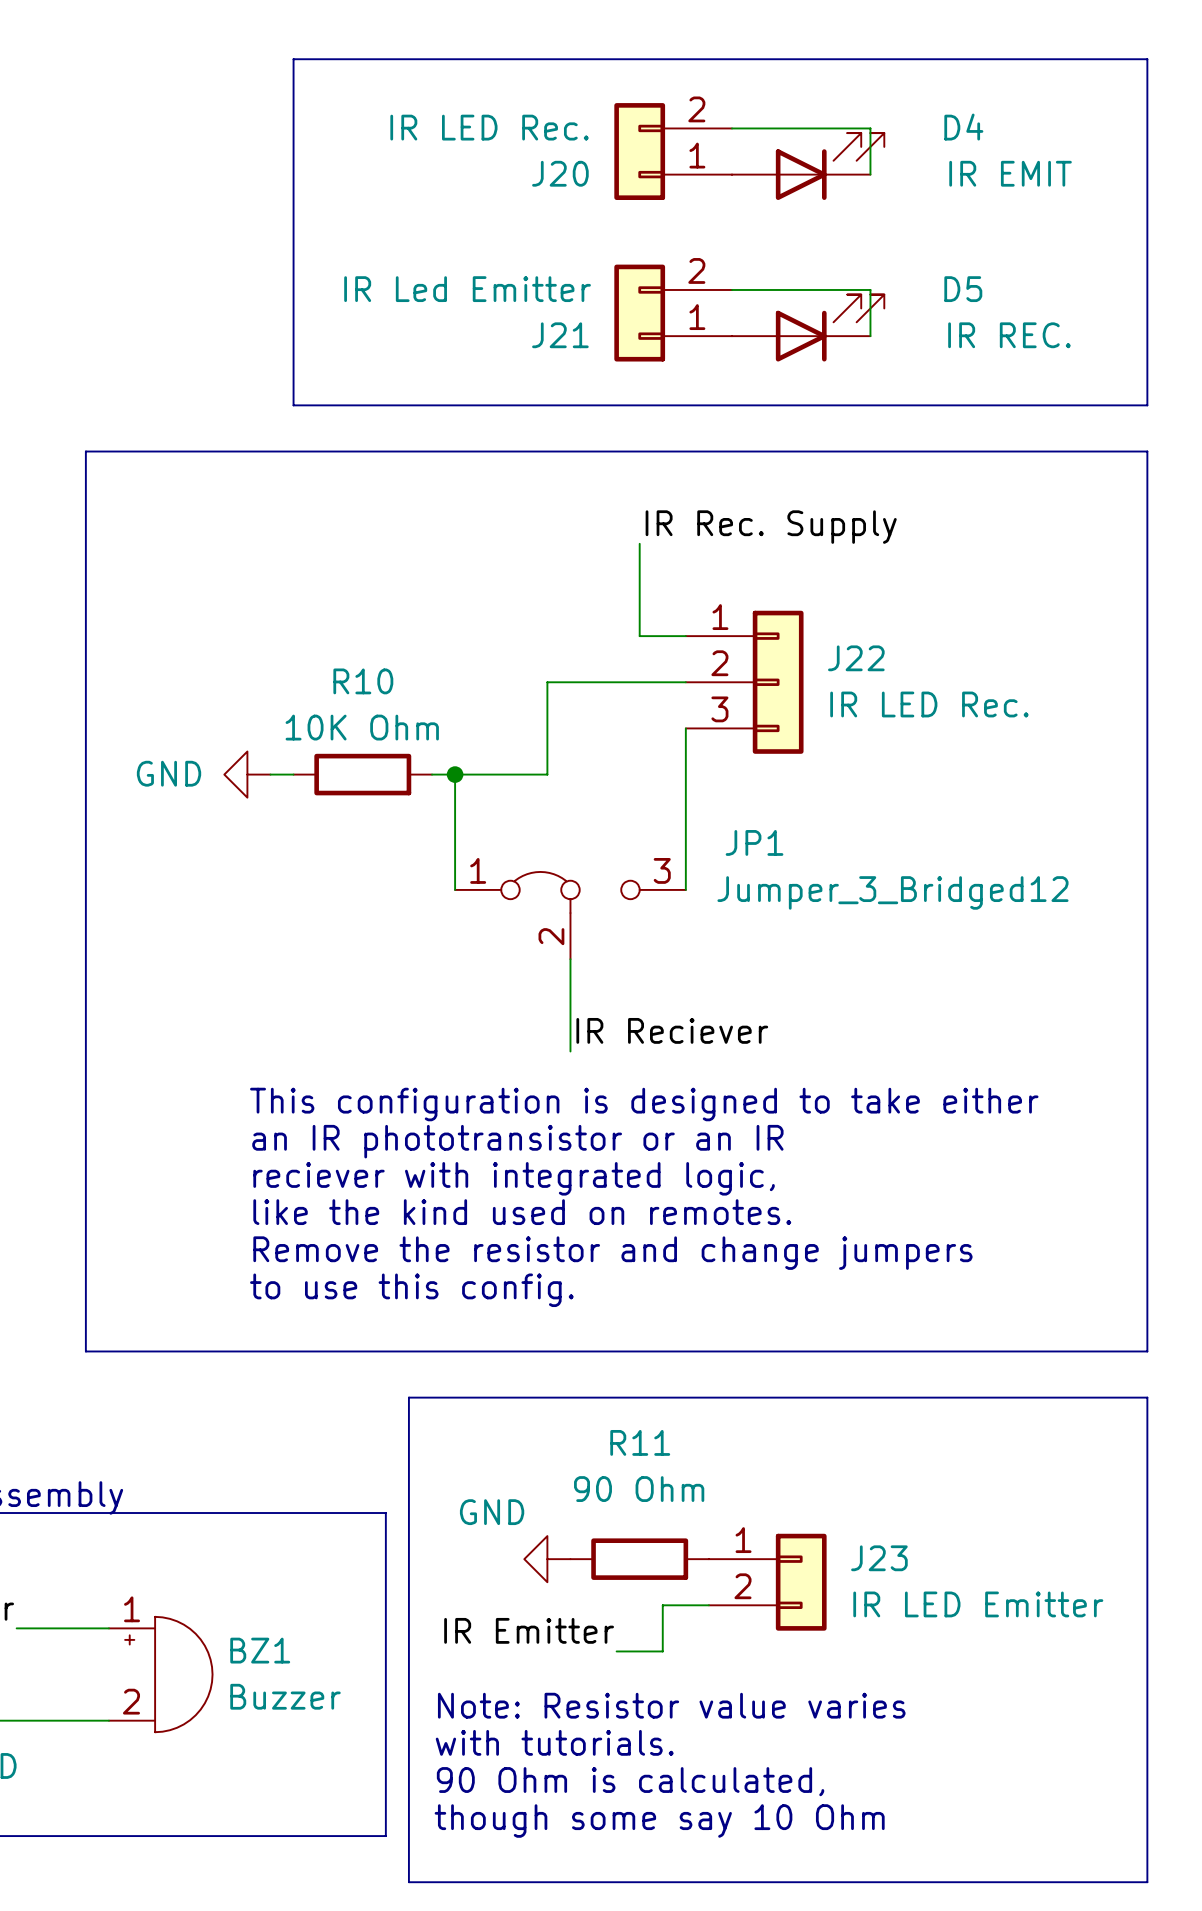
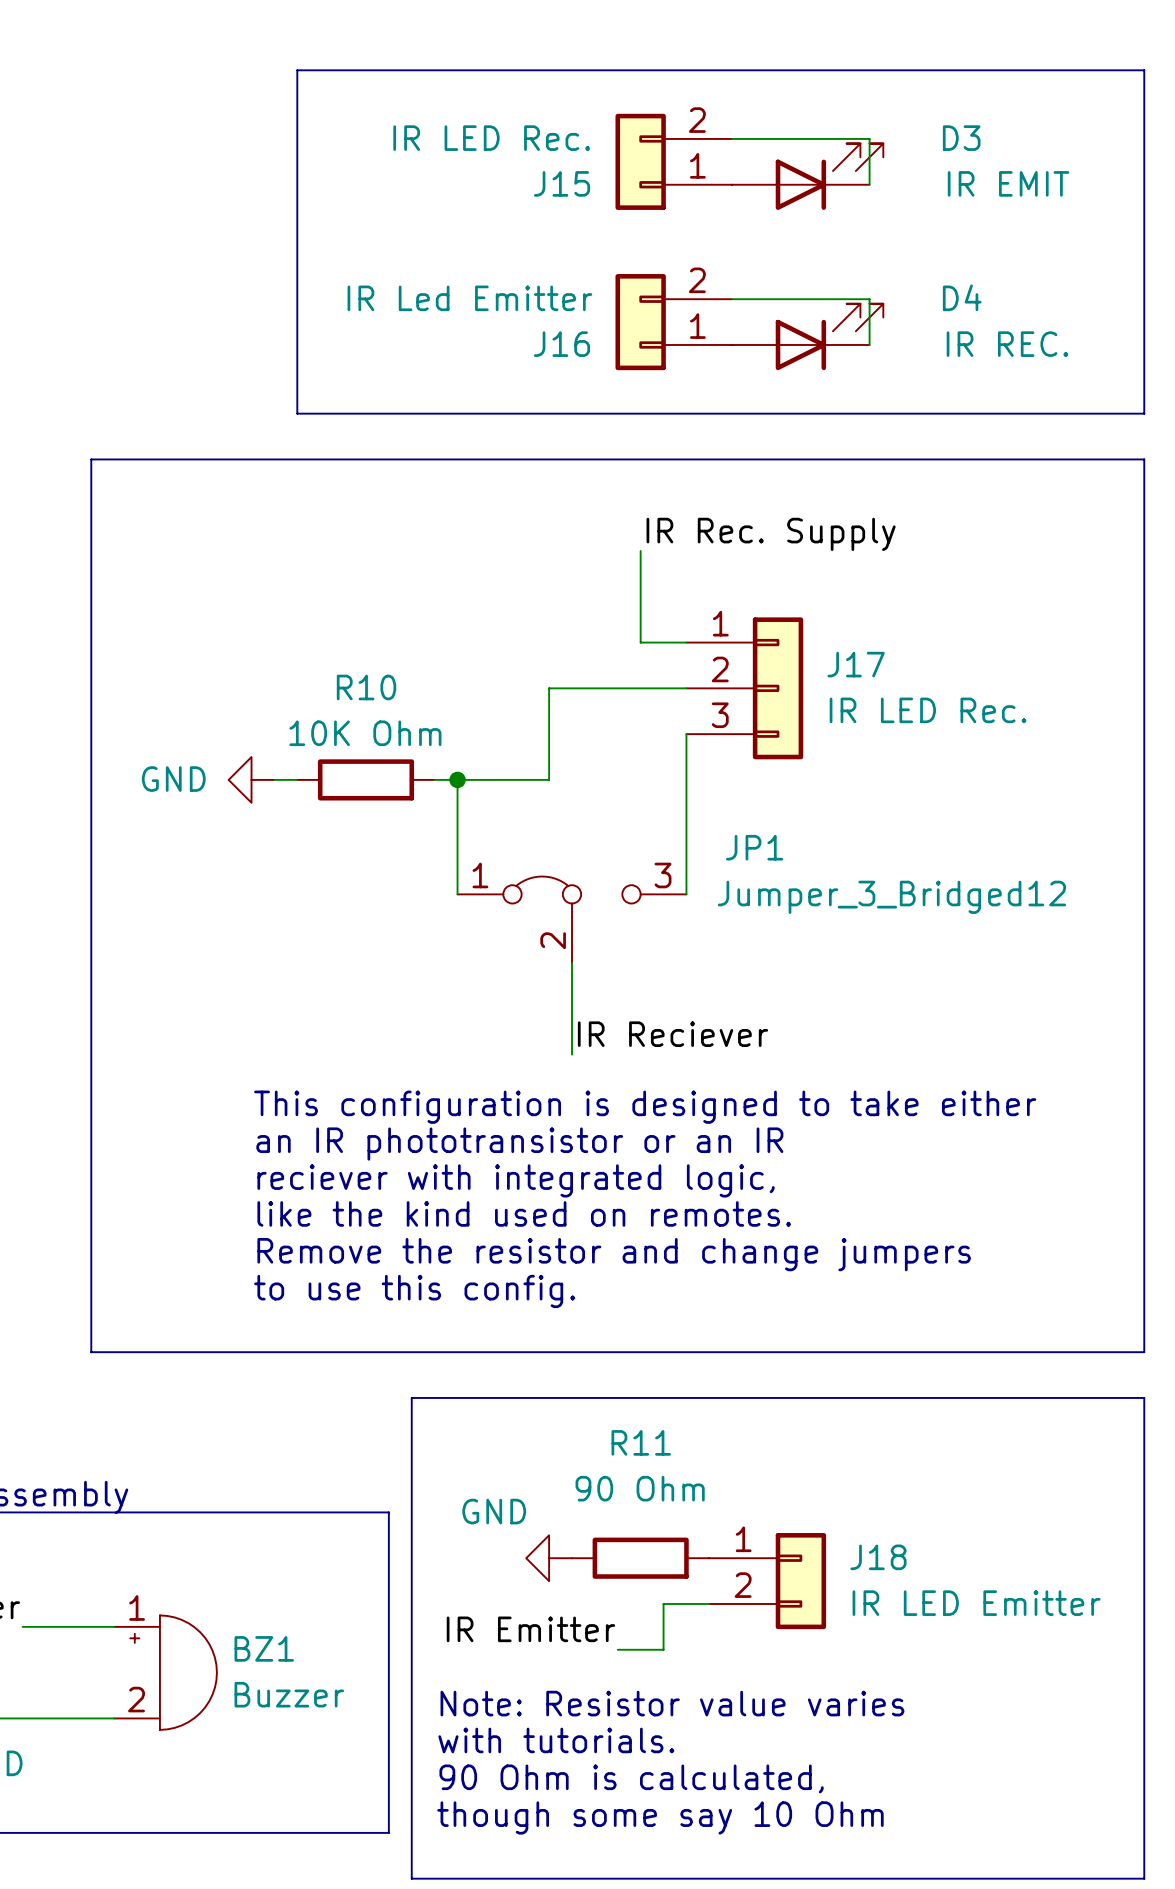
D4 name: D4 (963, 127) -> D3 (961, 138)
J20 name: J20 (560, 173) -> J15 (562, 183)
D5 name: D5 (963, 289) -> D4 (962, 297)
J21 name: J21 (560, 335) -> J16 (562, 344)
J22 name: J22 (856, 658) -> J17 (856, 664)
J23 name: J23 (879, 1558) -> J18 (878, 1557)

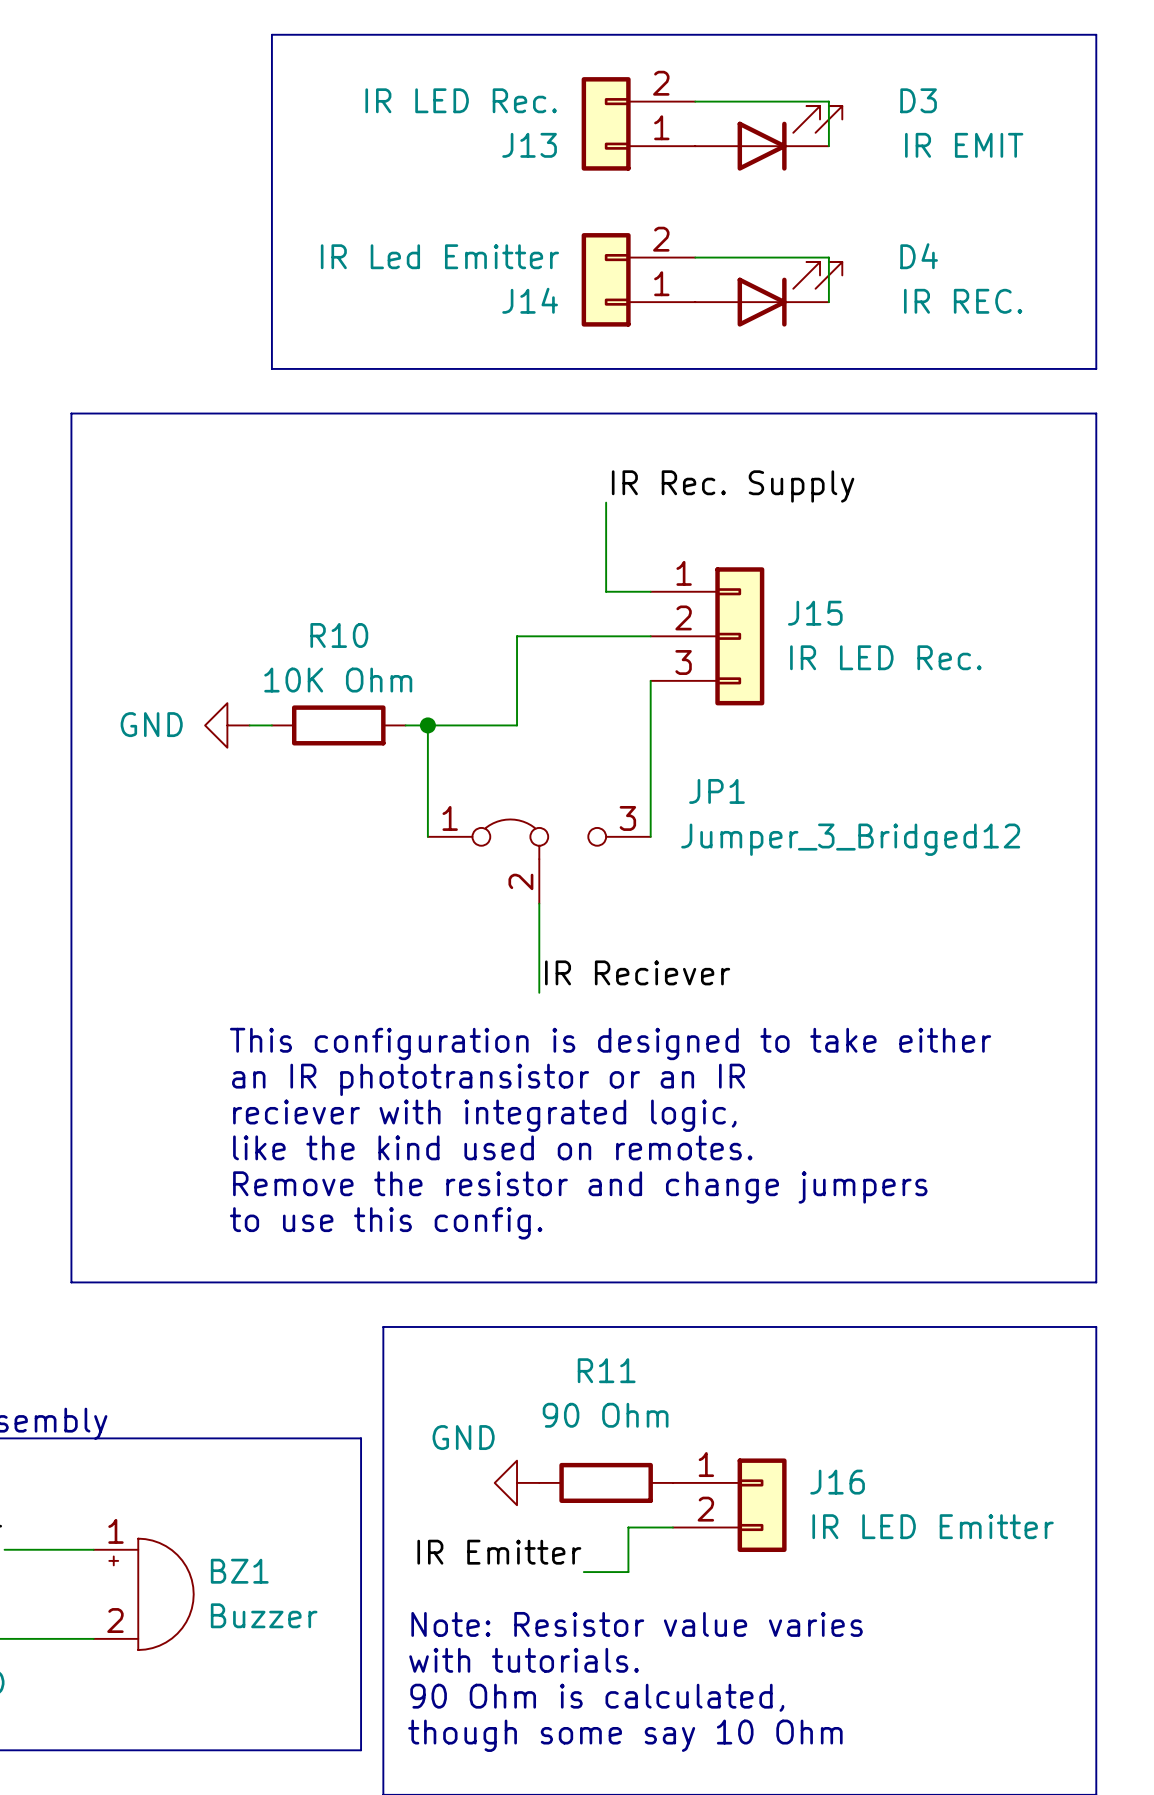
J15 name: J15 (562, 183) -> J13 (529, 145)
J16 name: J16 (562, 344) -> J14 (530, 300)
J17 name: J17 (856, 664) -> J15 (815, 613)
J18 name: J18 (878, 1557) -> J16 (837, 1482)

